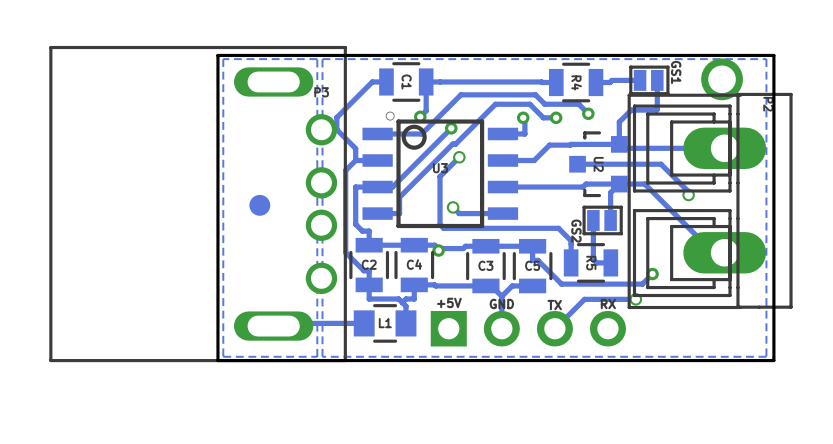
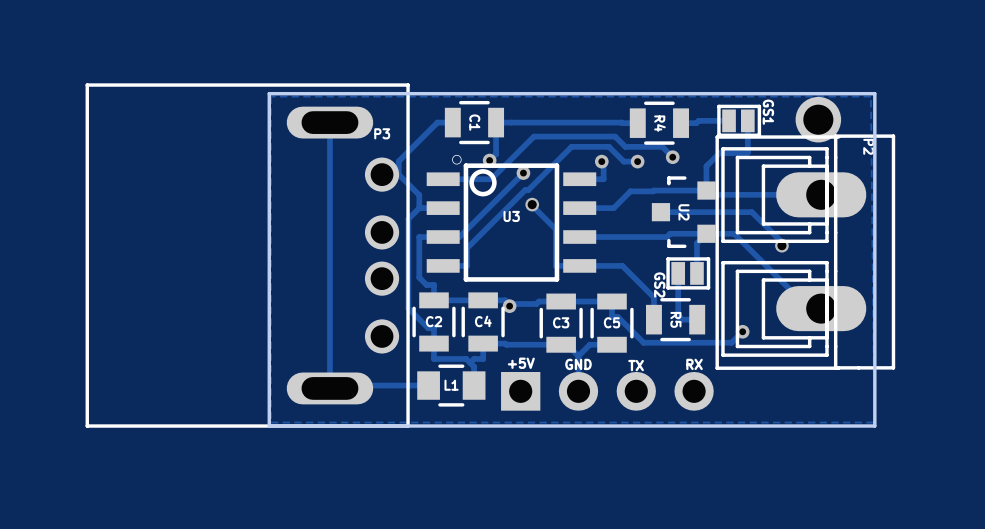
zone outline: (317, 59) (223, 59) (223, 356) (317, 356) (317, 59) -> none
zone outline: (766, 59) (322, 59) (322, 356) (766, 356) (766, 59) -> (870, 96) (874, 422) (271, 422) (271, 96) (870, 96)
track: none -> (329, 122) (329, 385)
track: (459, 157) (440, 176) (440, 224) (443, 228) (558, 228) (571, 242) -> (579, 265) (622, 265) (653, 297)
part: (259, 205) -> none
track: (453, 207) (459, 213) (481, 213) -> (530, 204) (555, 229) (555, 265)
via: (453, 207) -> none
track: (635, 299) (584, 299) (555, 328) -> none
via: (635, 299) -> none

